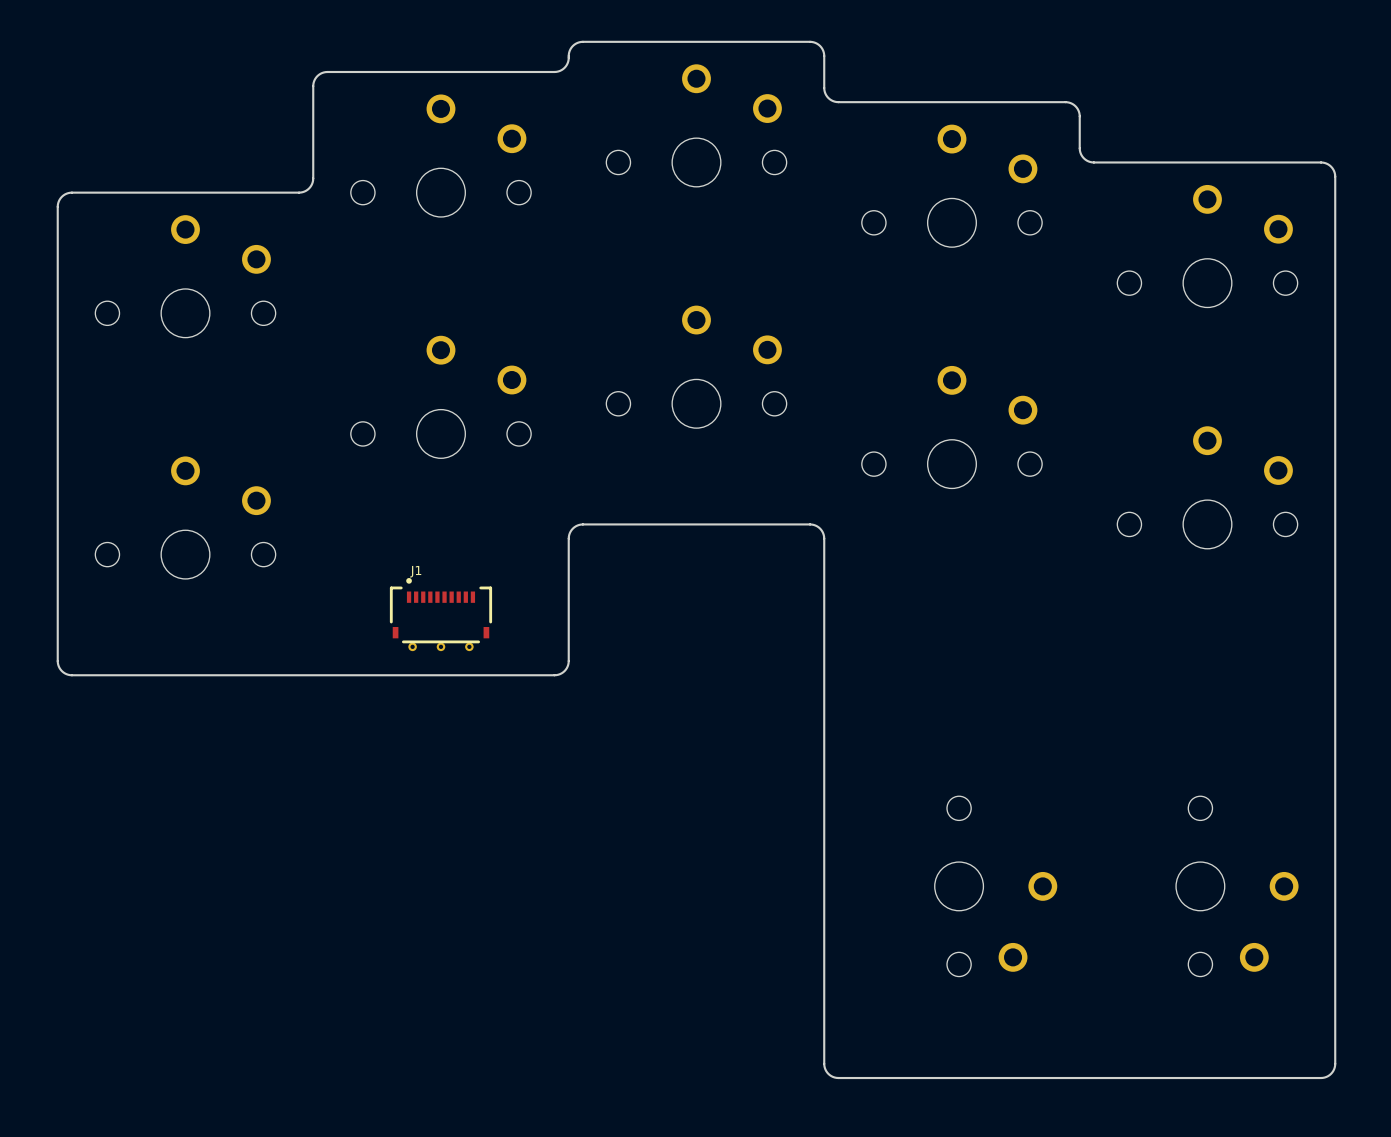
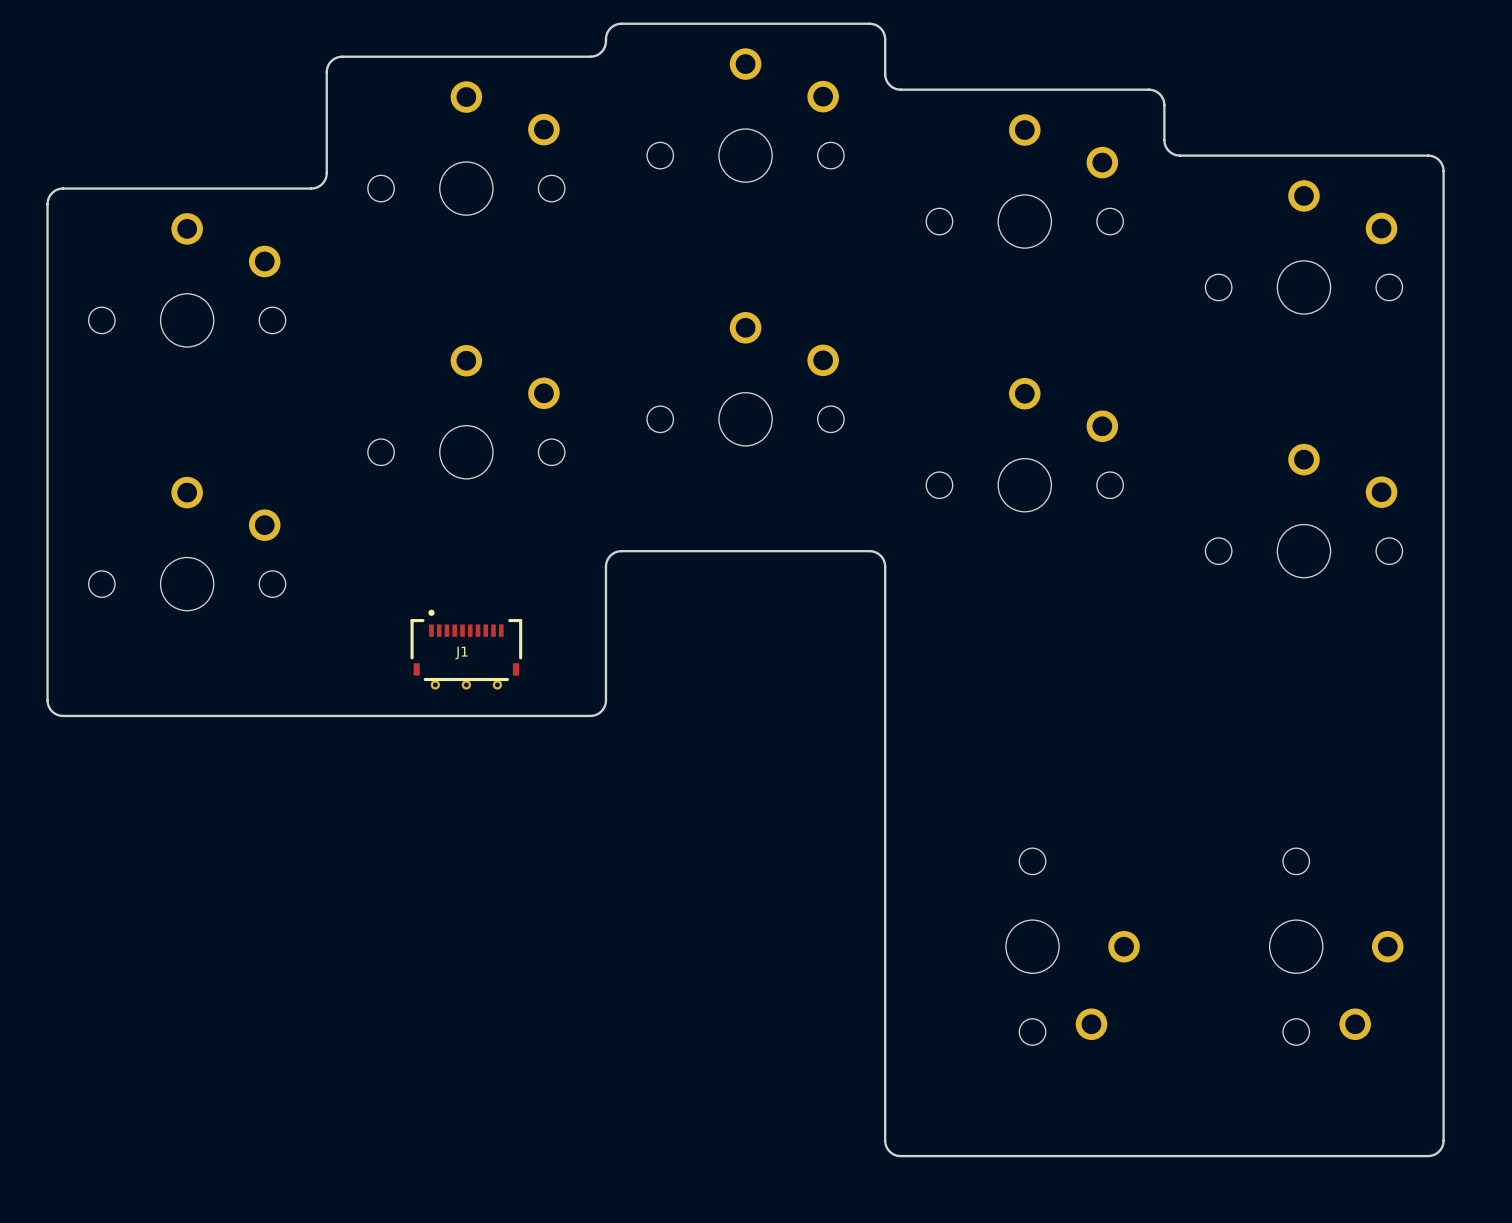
J1 name position: J1 (415, 571) -> J1 (461, 652)

